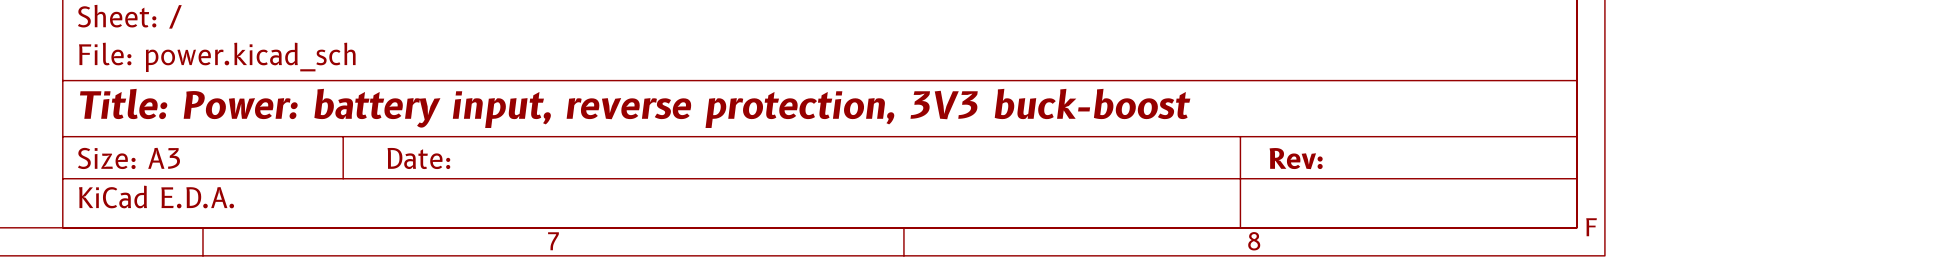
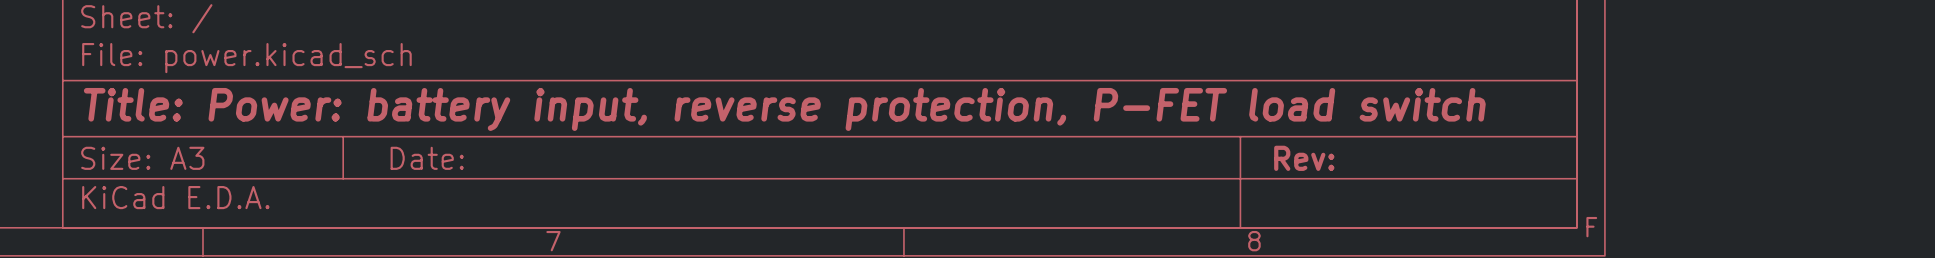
title block: Title: Power: battery input, reverse protection, 3V3 buck-boost (635, 108) -> Title: Power: battery input, reverse protection, P-FET load switch (784, 109)

